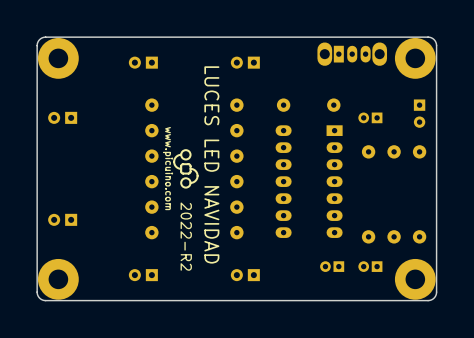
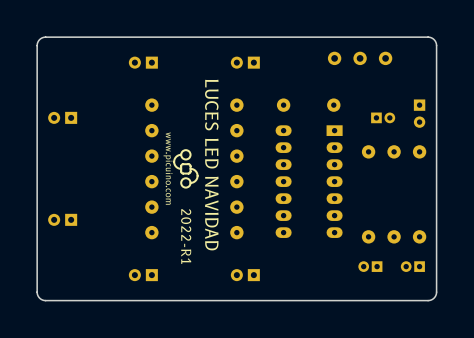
part: (352, 54) -> none
part: (58, 58) -> none
part: none -> (360, 58)
part: (415, 58) -> none
part rotation: 0° (370, 117) -> 180° (383, 117)
text: 2022-R2 (186, 236) -> 2022-R1 (186, 236)
part: (332, 266) -> none
part: none -> (412, 266)
part: (58, 279) -> none
part: (415, 279) -> none

